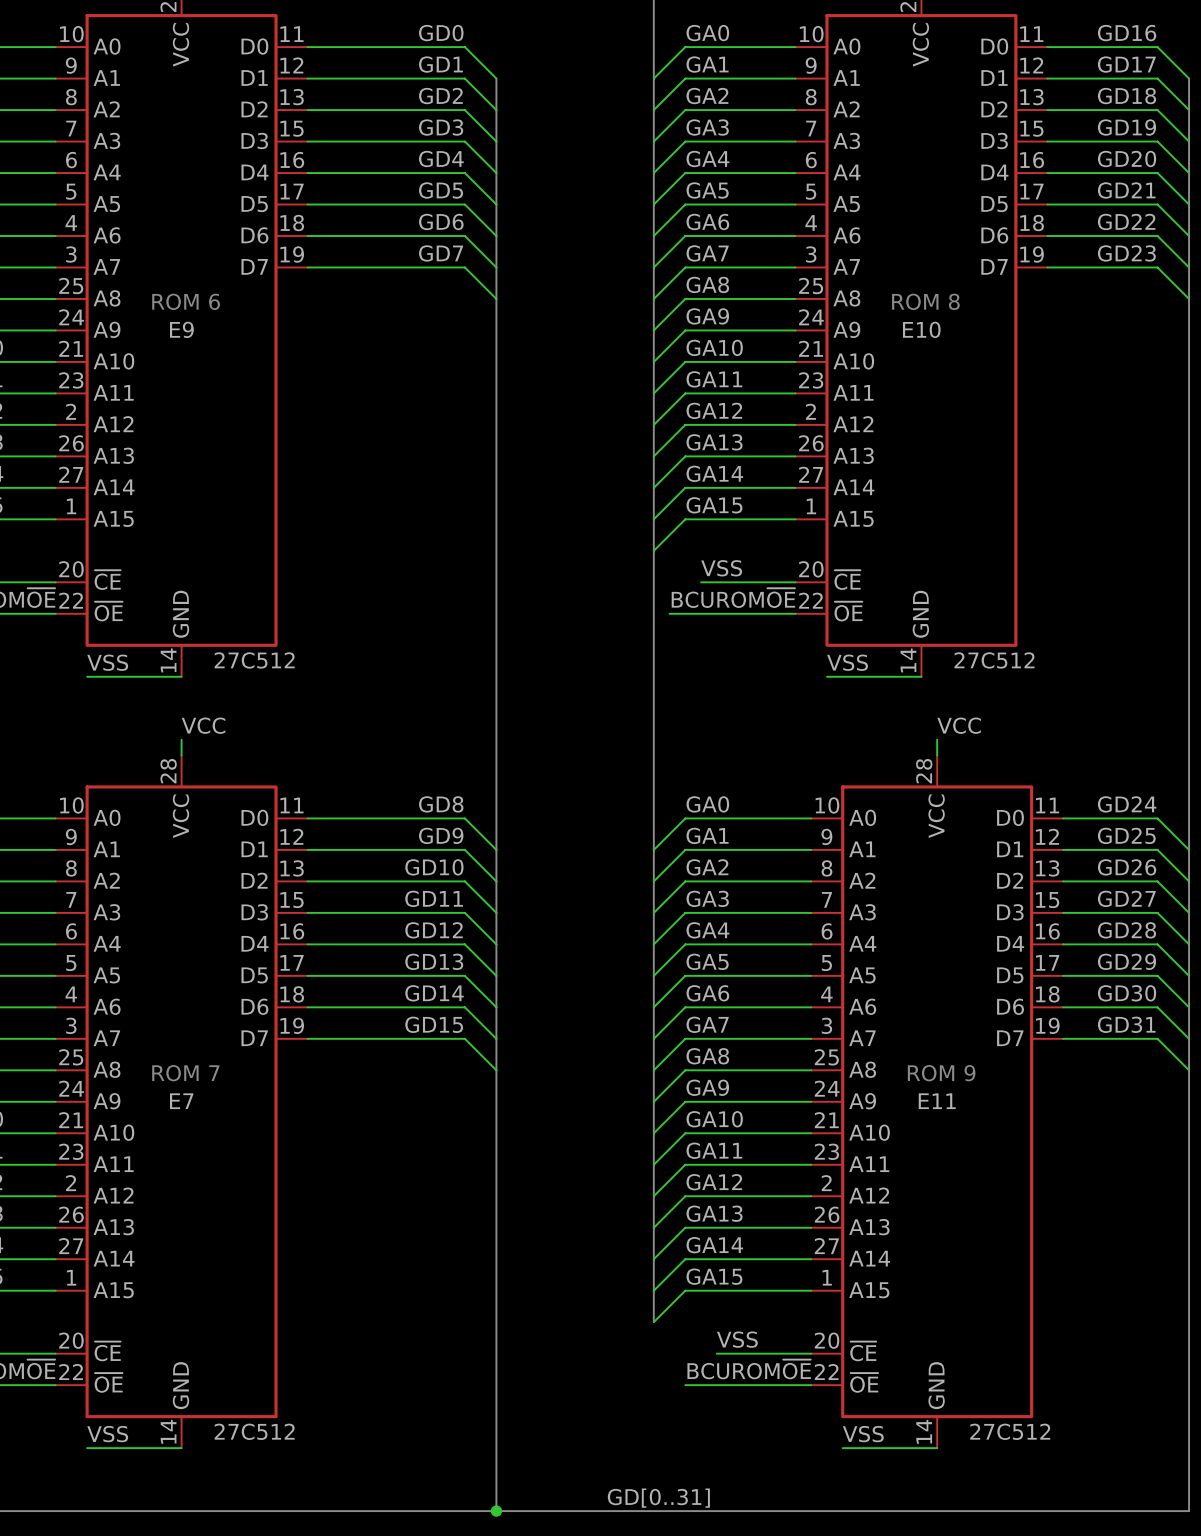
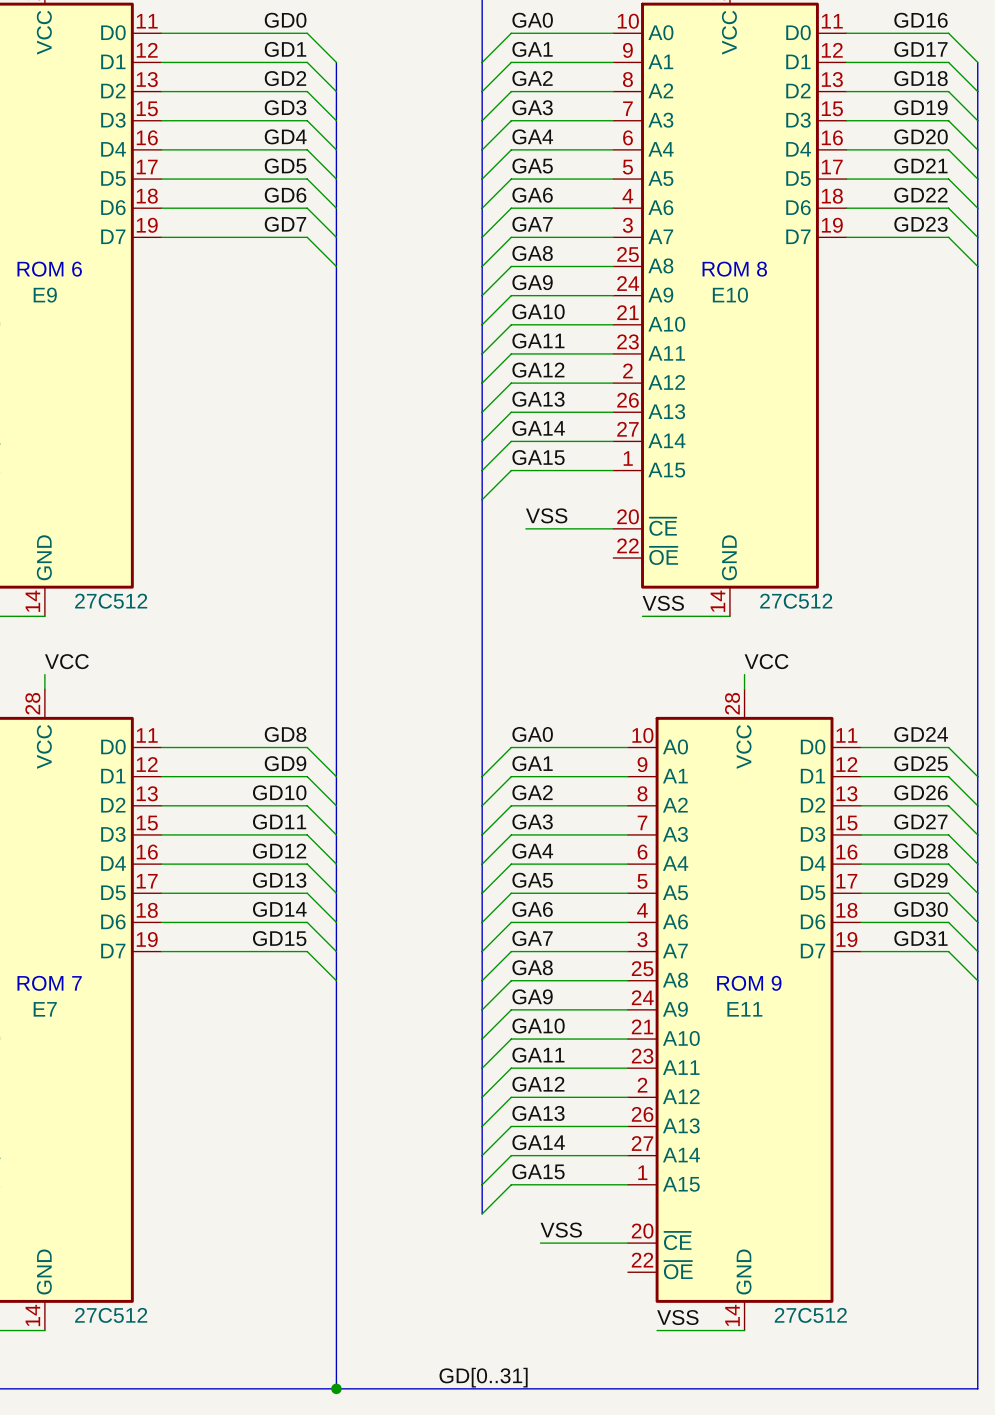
label: BCUROM~{OE} (733, 598) -> none
wire: (669, 613) (795, 613) -> none
label: BCUROM~{OE} (749, 1369) -> none
wire: (685, 1385) (811, 1385) -> none

